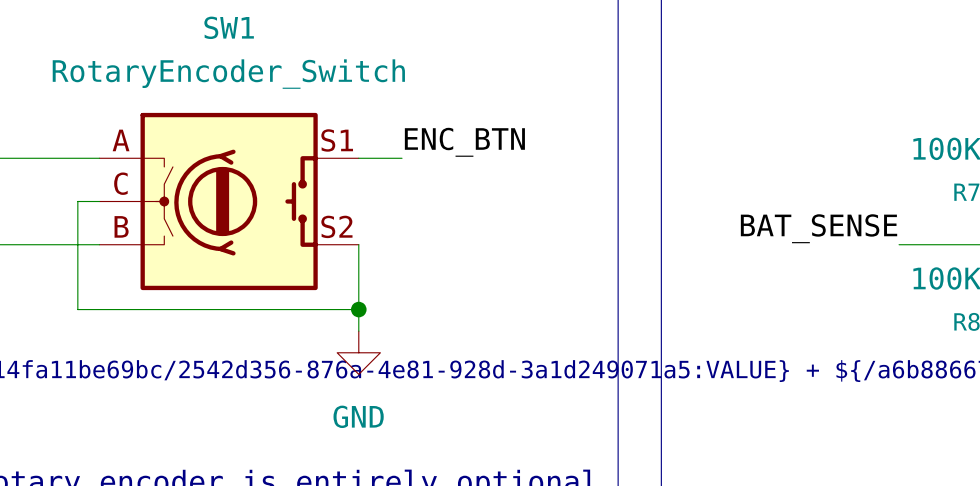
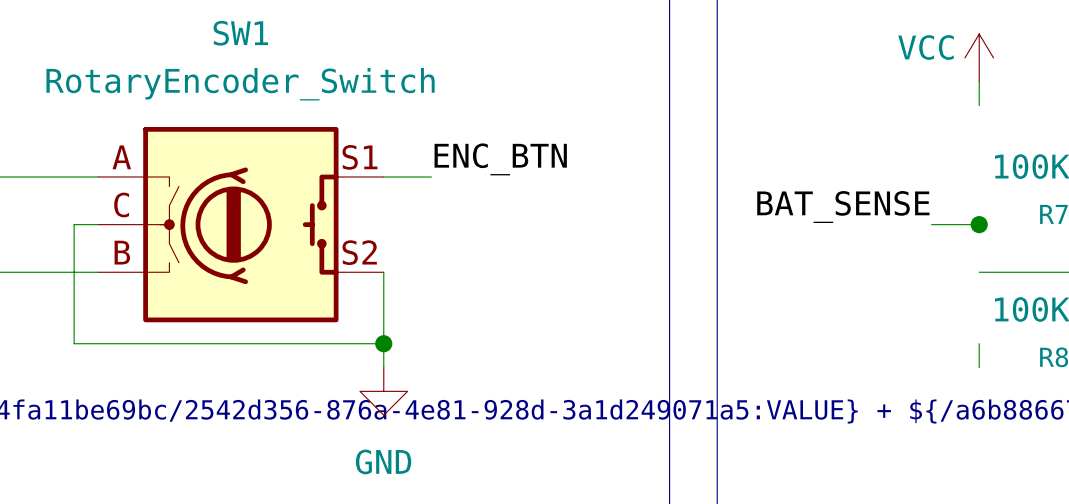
power symbol: none -> VCC (979, 57)
wire: none -> (979, 81) (979, 105)
wire: none -> (931, 224) (979, 224)
junction: none -> (979, 224)
label position: BAT_SENSE (819, 228) -> BAT_SENSE (843, 207)
wire: none -> (979, 343) (979, 367)

